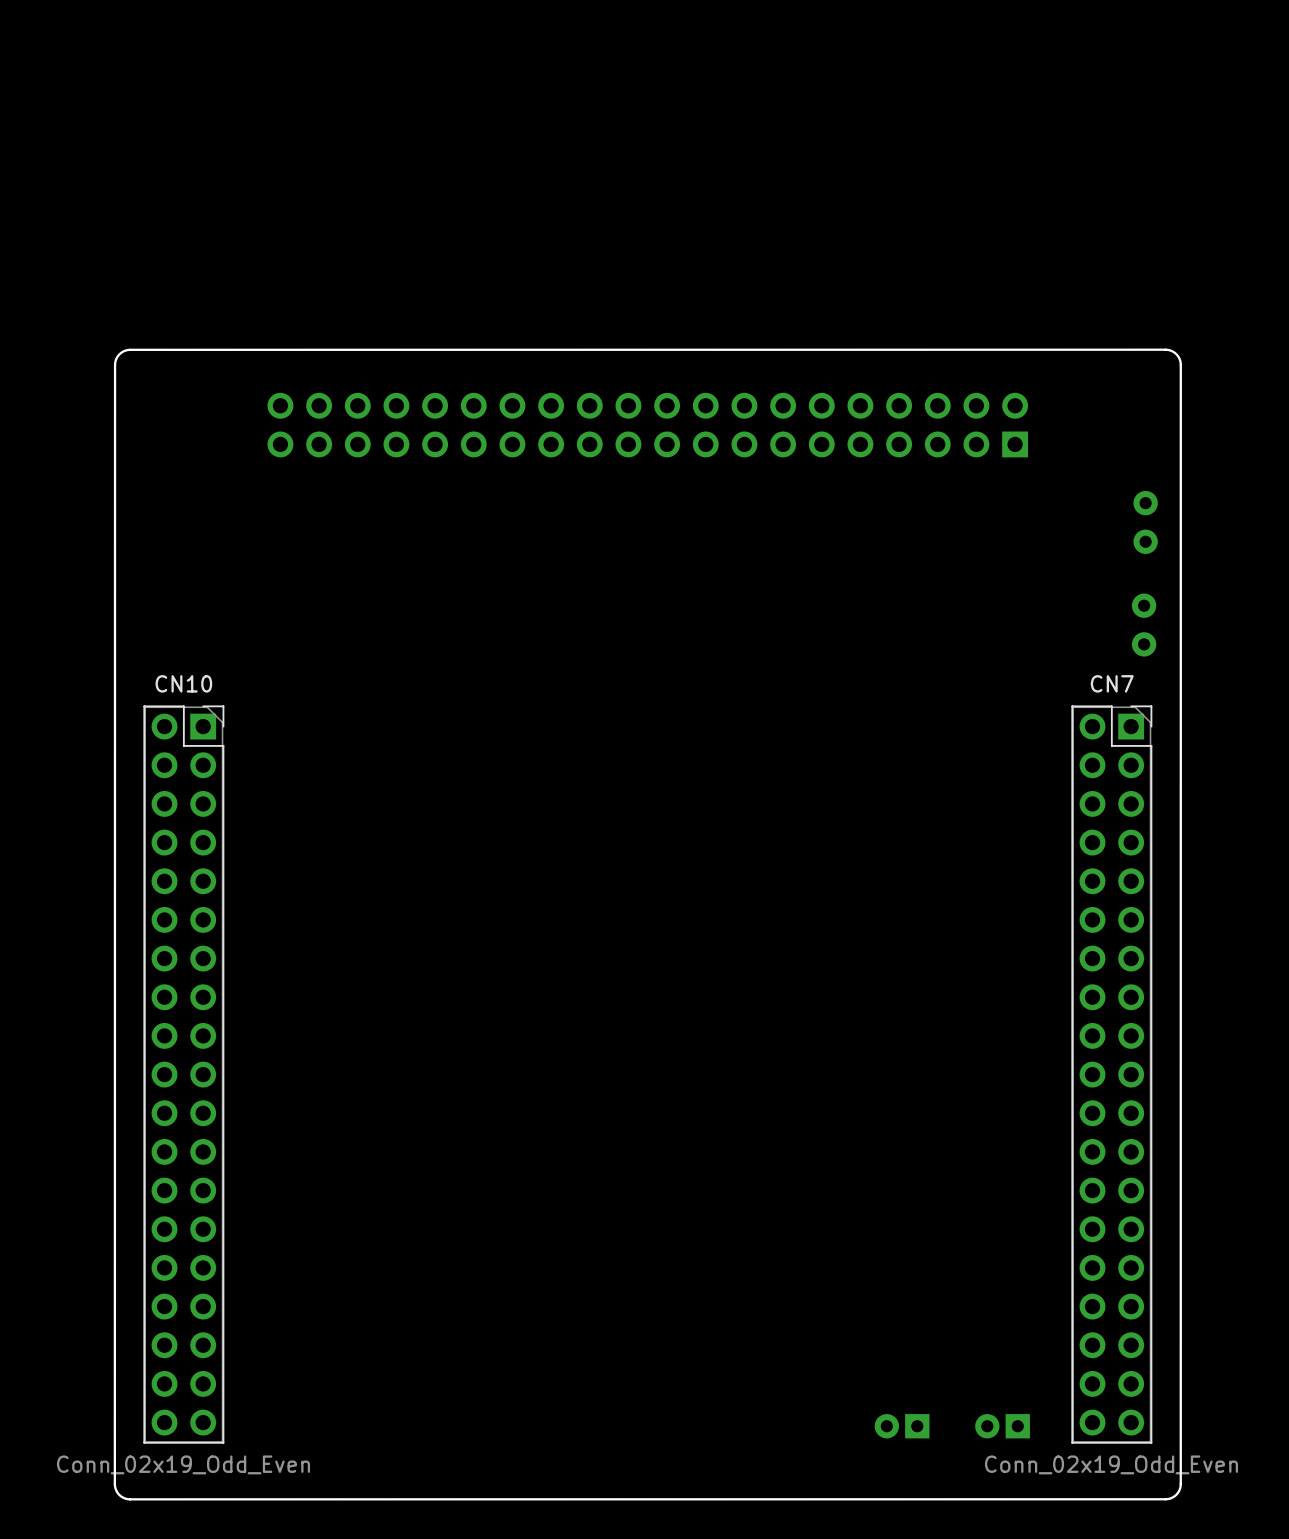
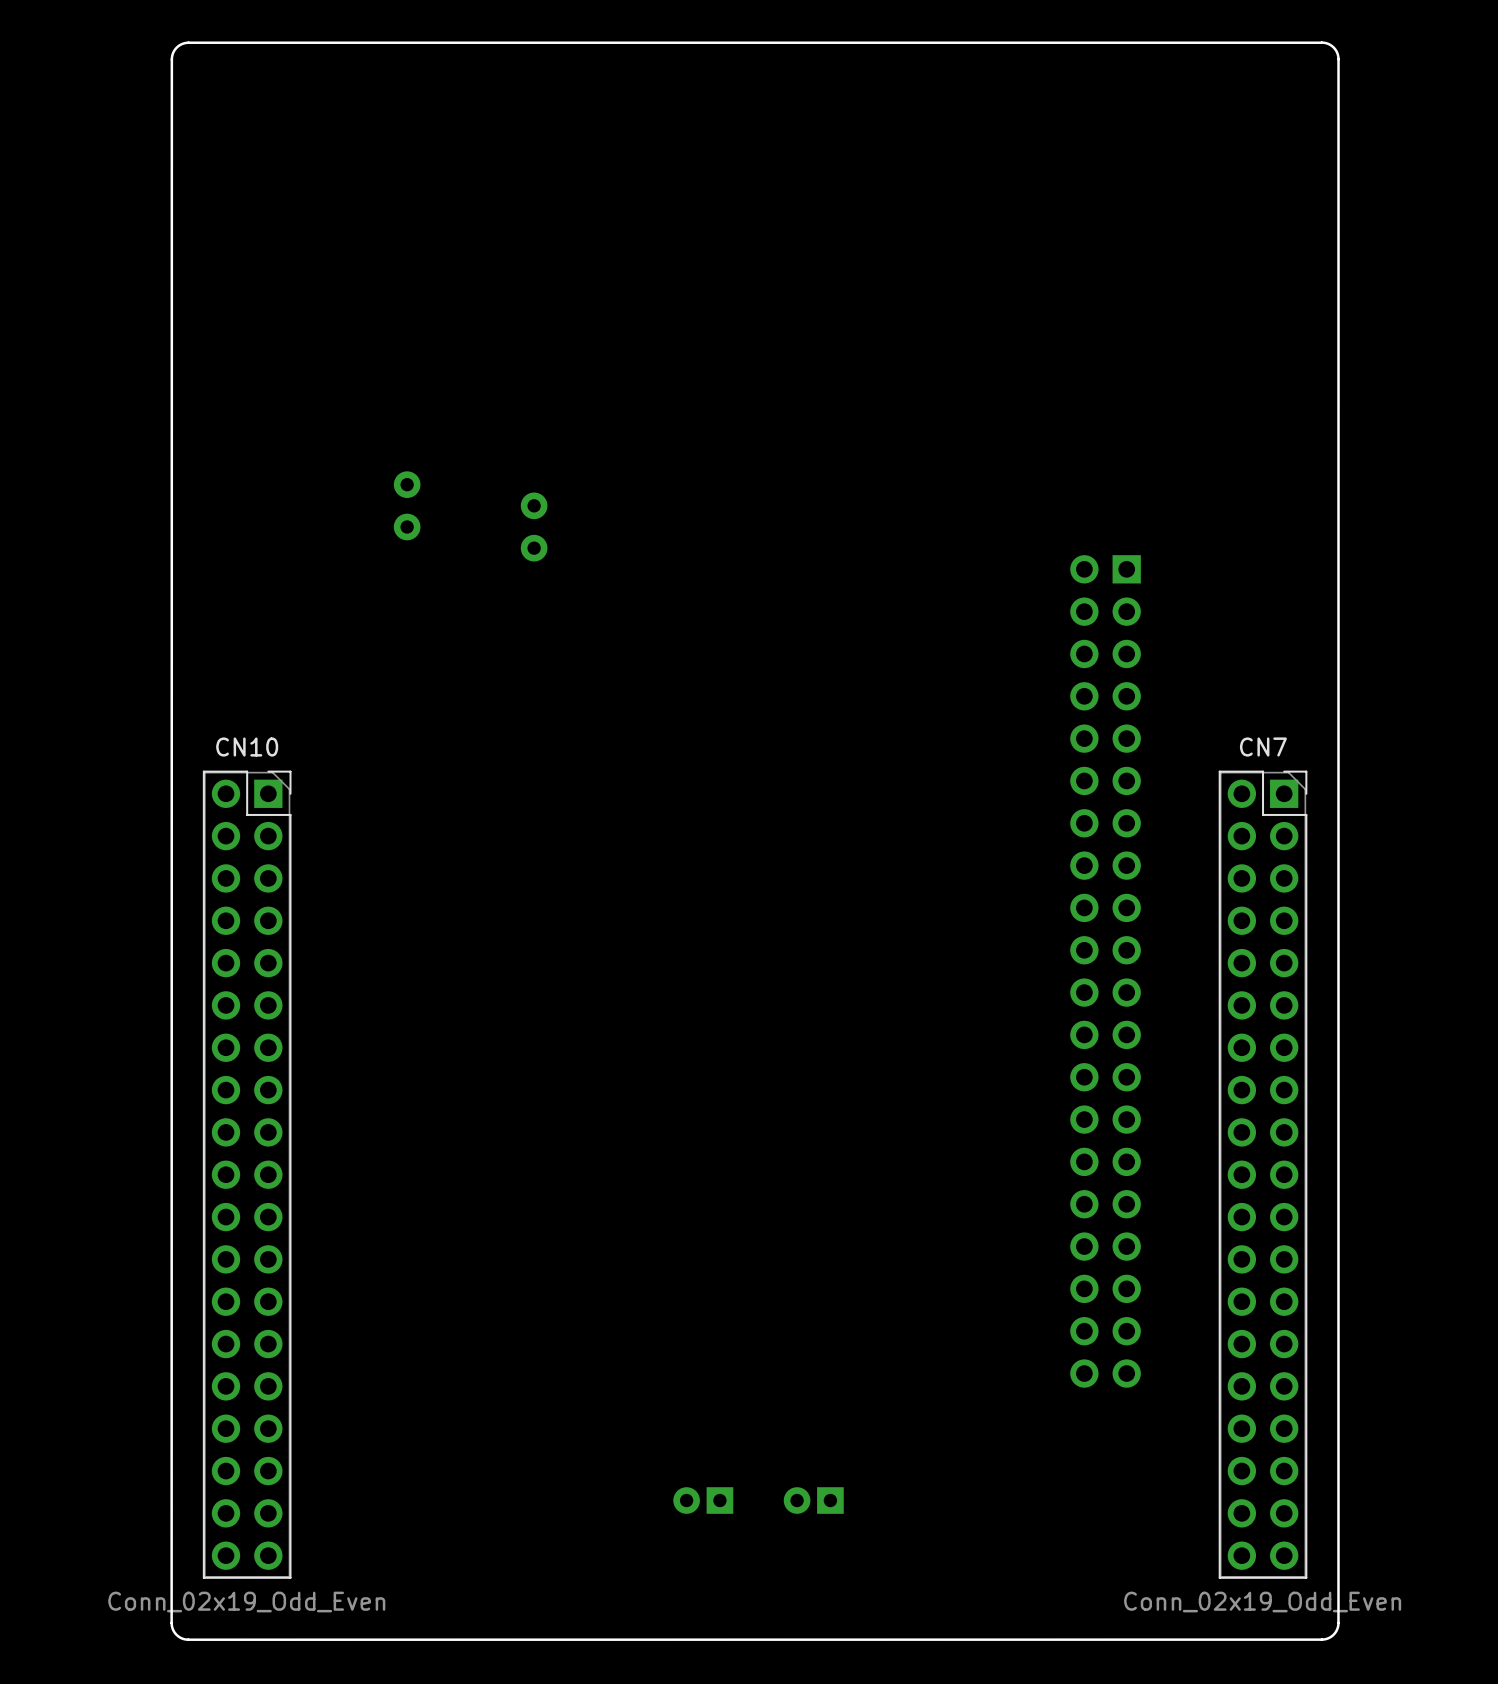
board edge: none -> (1321, 42) (1333, 47) (1338, 59) (1338, 397)
board edge: (1180, 364) (1176, 354) (1165, 349) (130, 349) (119, 354) (115, 365) (114, 1484) -> (1321, 42) (188, 42) (182, 44) (175, 49) (171, 59) (171, 1623)
part: (647, 425) -> none
part: none -> (407, 505)
part: none -> (534, 526)
part: (1145, 522) -> none
part: (1144, 625) -> none
part: none -> (1105, 971)
part: none -> (703, 1500)
part: none -> (813, 1500)
part: (902, 1426) -> none
part: (1002, 1426) -> none

